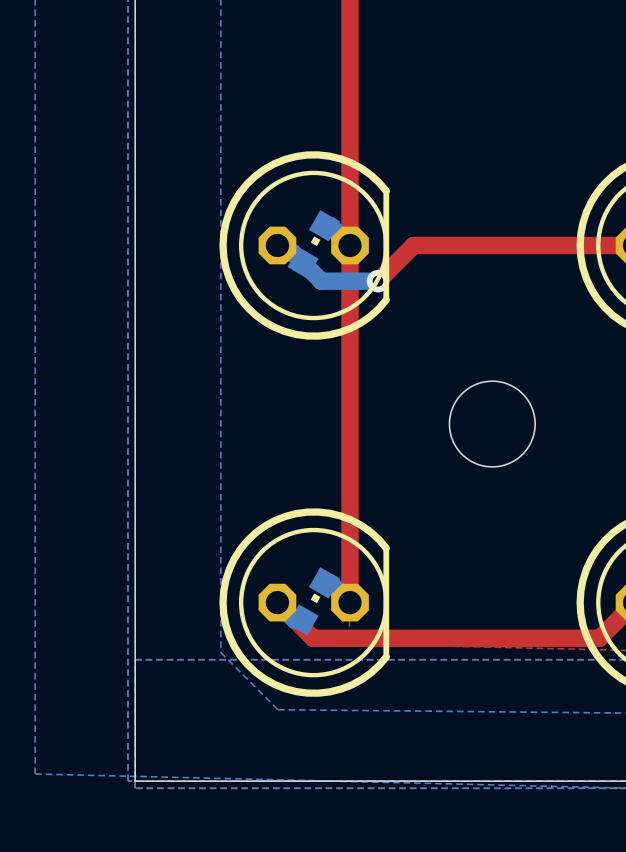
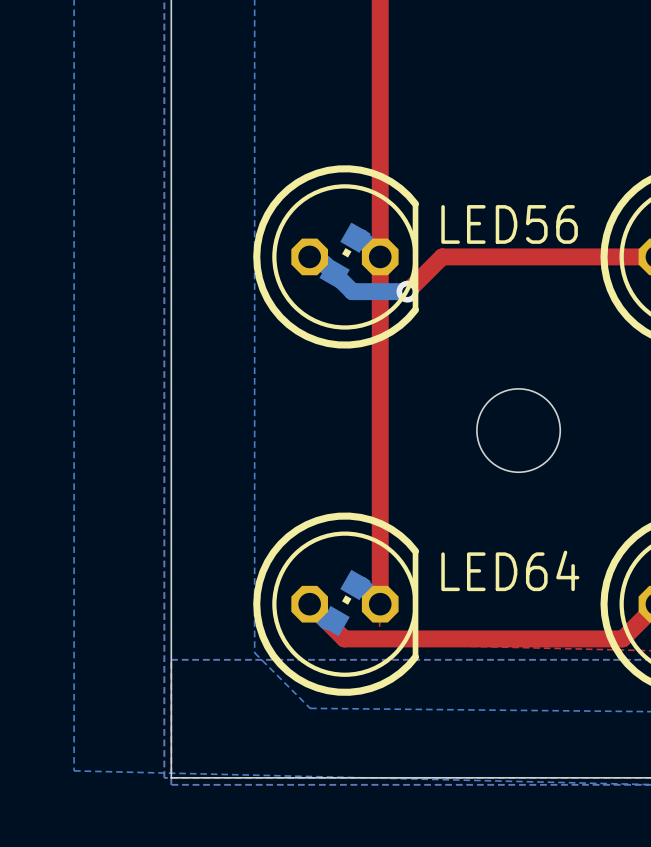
LED56 name: none -> LED56 (509, 224)
LED64 name: none -> LED64 (510, 570)

